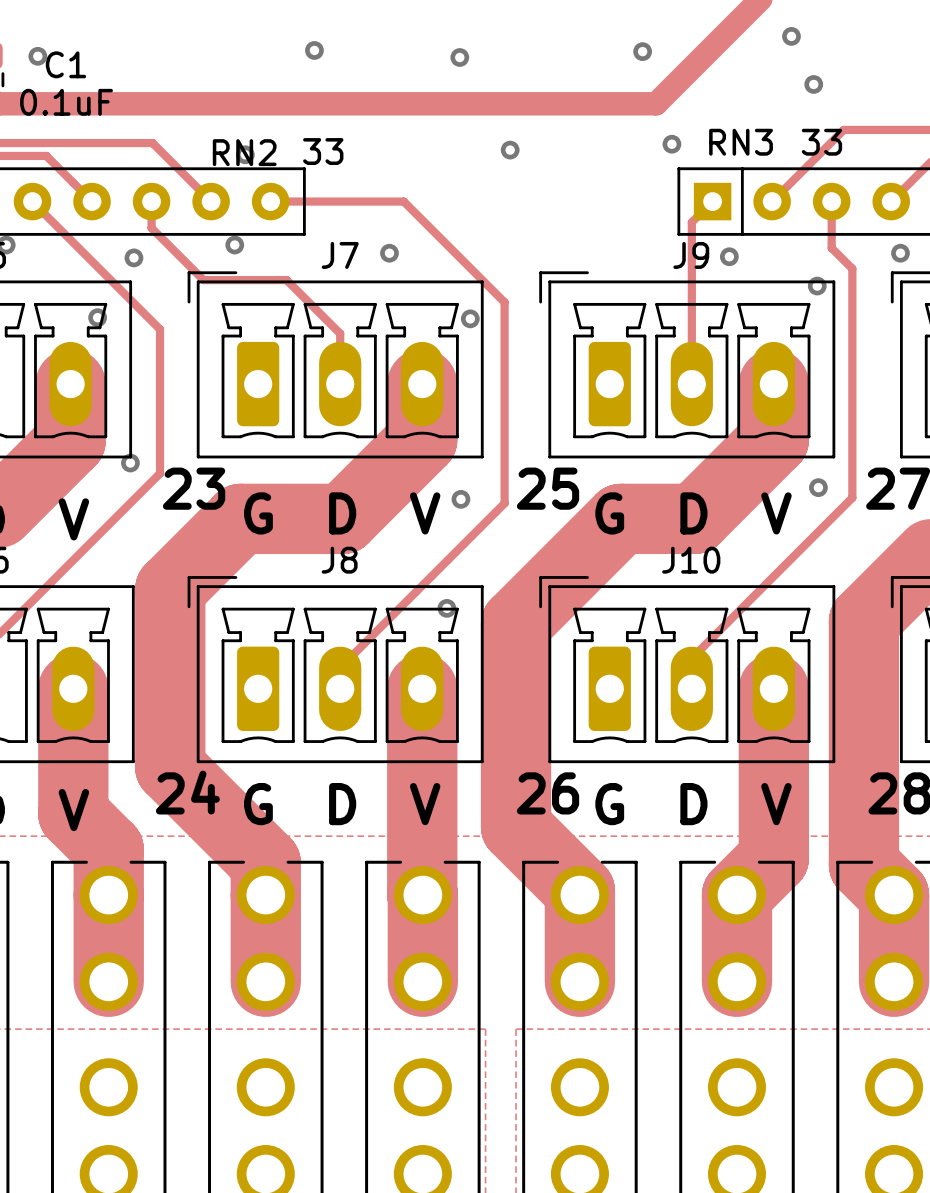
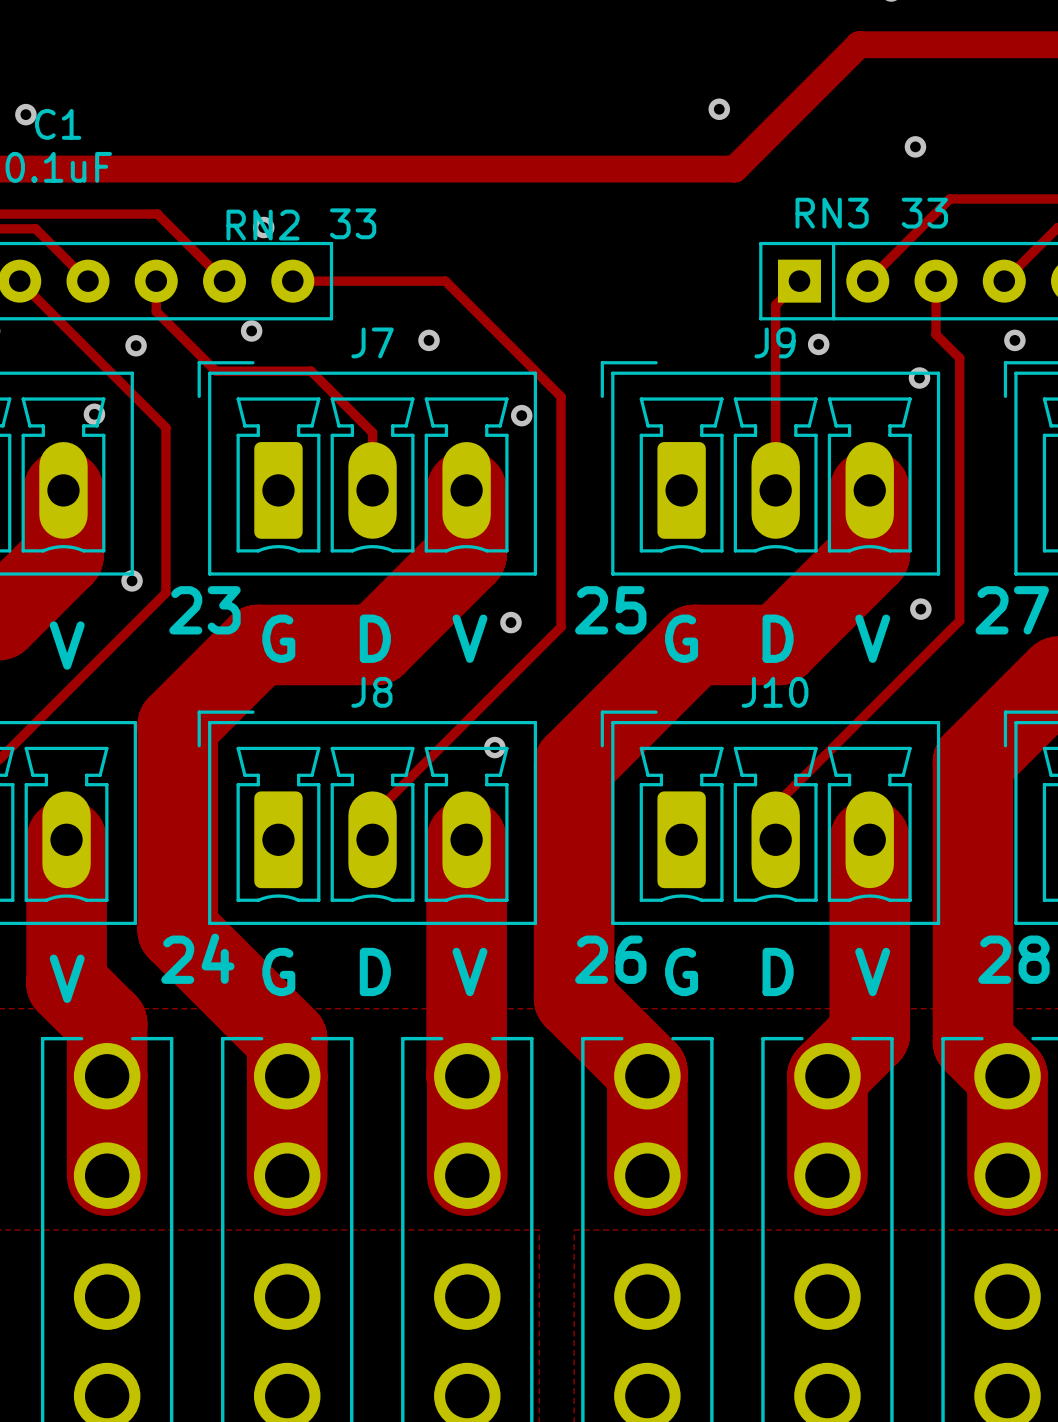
via: (791, 36) -> none
via: (314, 50) -> none
via: (459, 57) -> none
via: (671, 144) -> none
via: (510, 150) -> none

